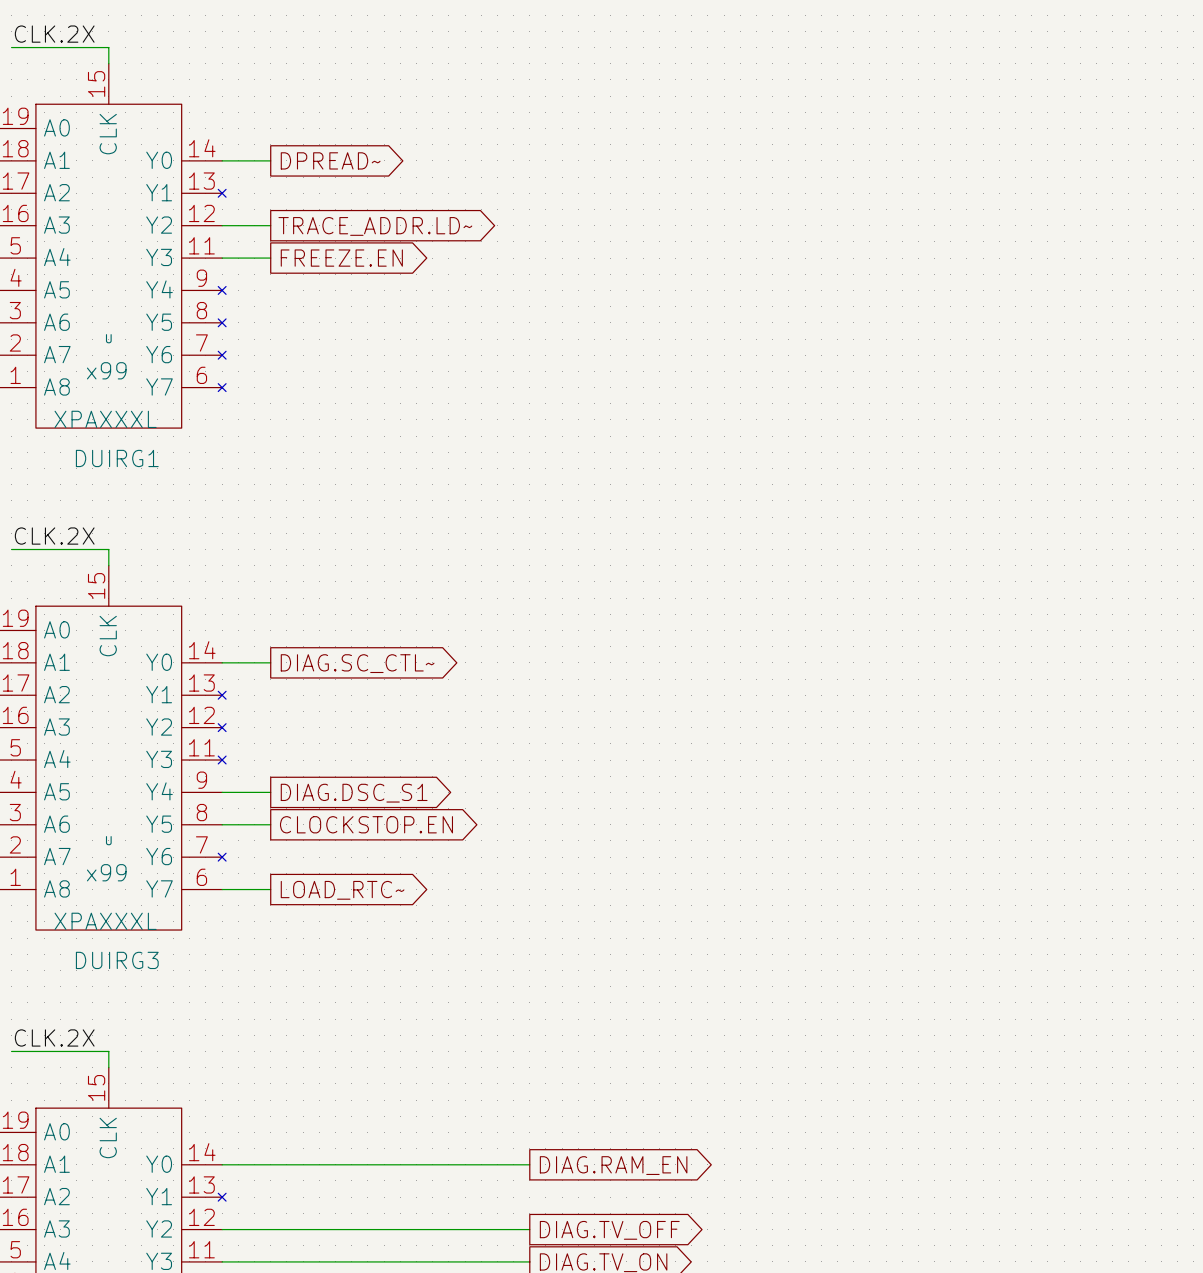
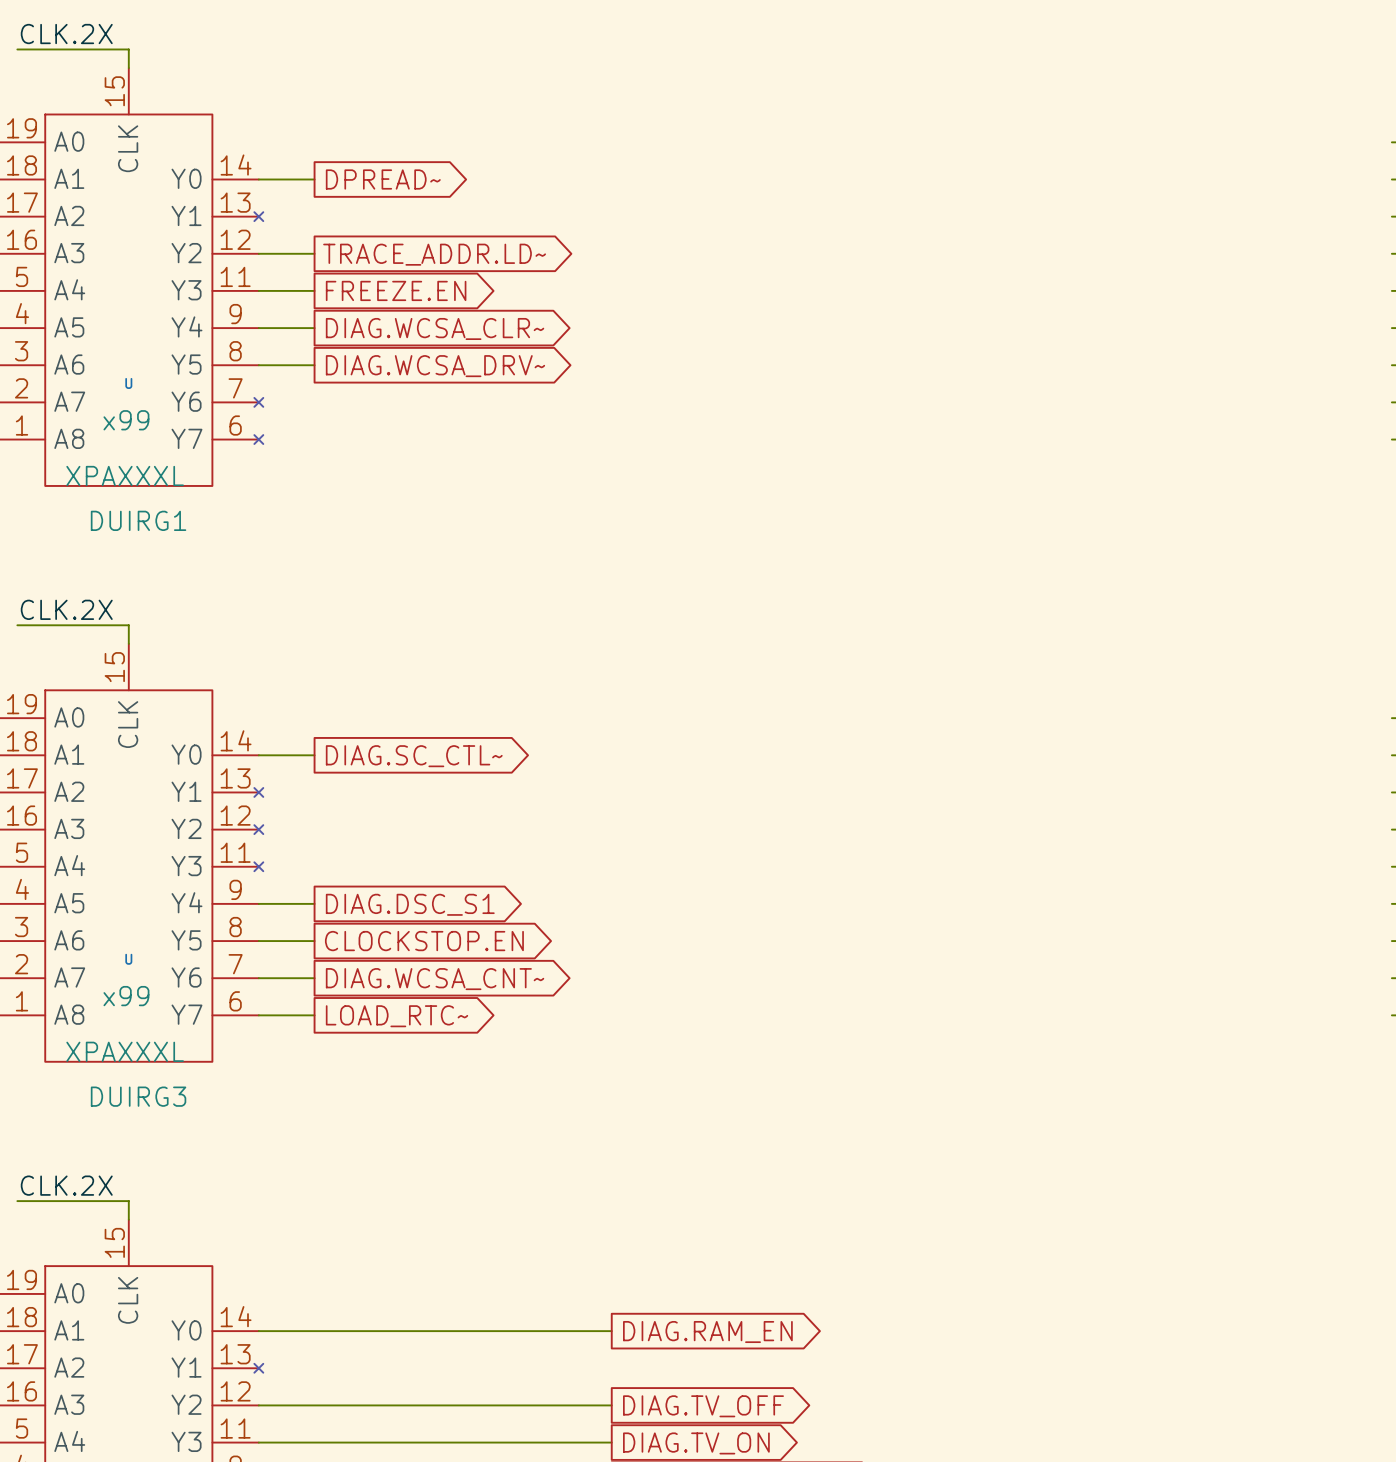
wire: none -> (258, 328) (314, 328)
no-connect mark: (222, 290) -> none
global label: none -> DIAG.WCSA_CLR~ (435, 328)
wire: none -> (258, 365) (314, 365)
no-connect mark: (222, 322) -> none
global label: none -> DIAG.WCSA_DRV~ (435, 366)
wire: none -> (258, 978) (314, 978)
no-connect mark: (222, 857) -> none
global label: none -> DIAG.WCSA_CNT~ (435, 979)

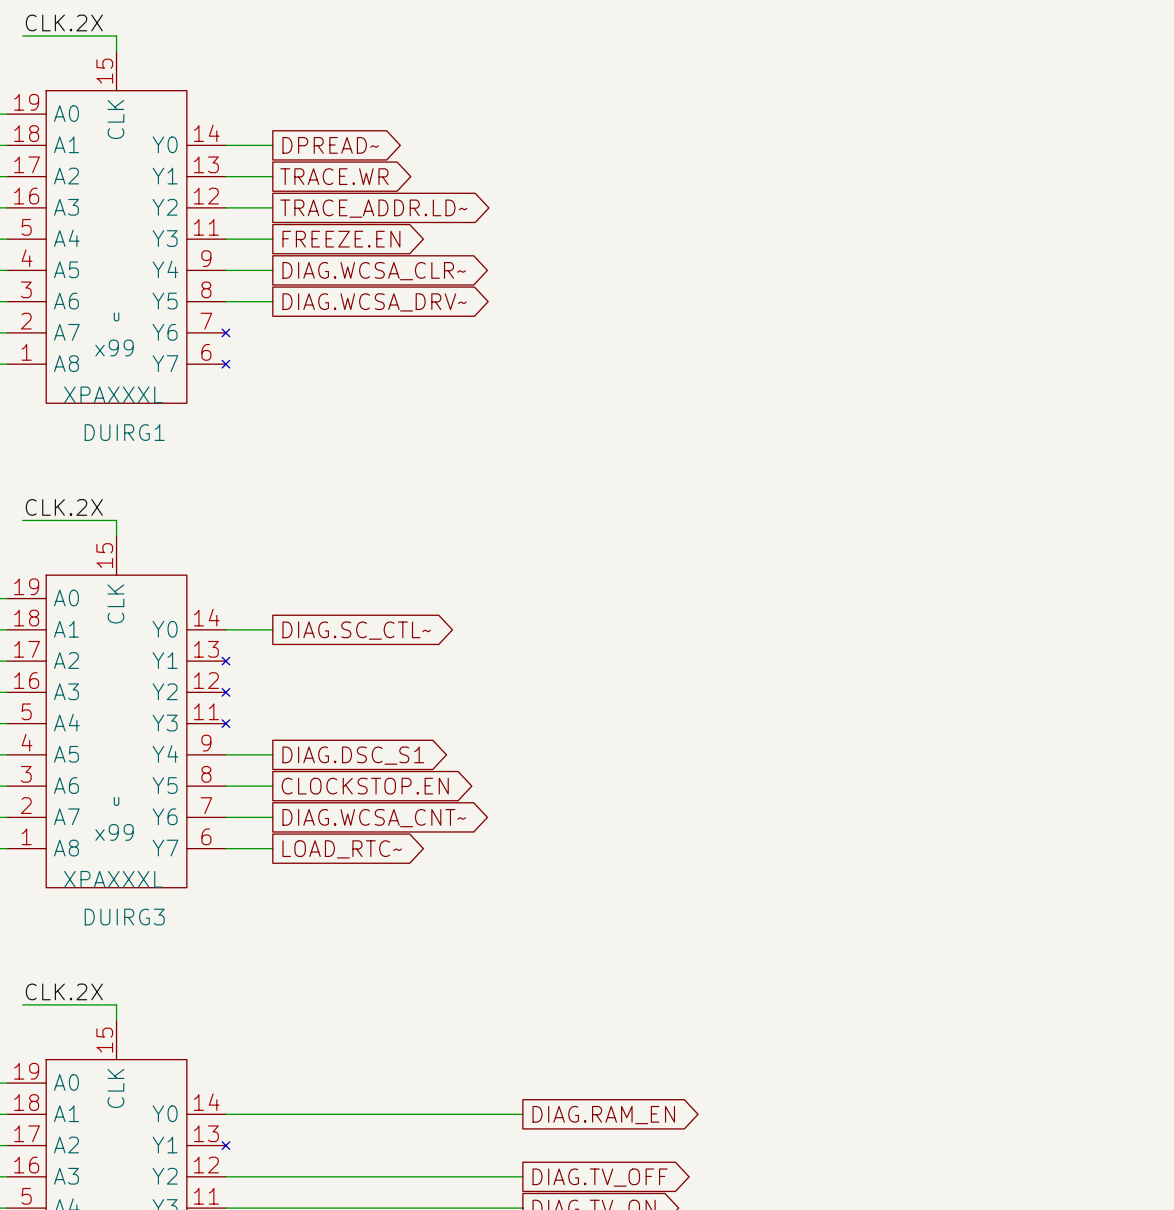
wire: none -> (225, 176) (272, 176)
no-connect mark: (258, 216) -> none
global label: none -> TRACE.WR (334, 176)

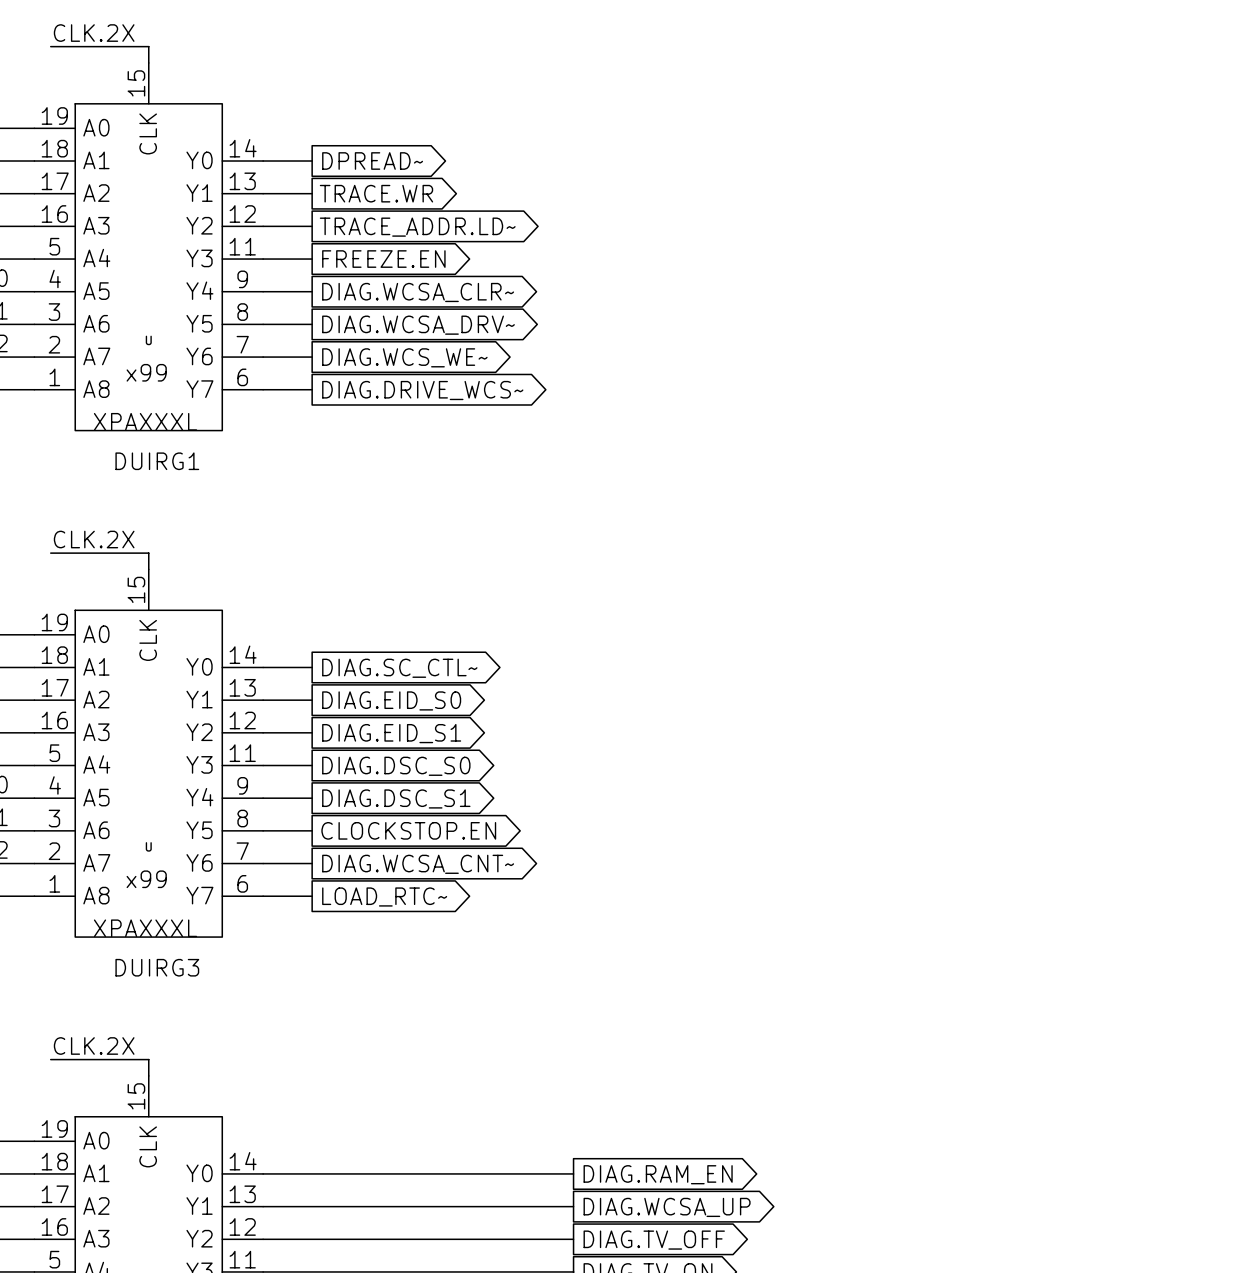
wire: none -> (263, 357) (312, 357)
no-connect mark: (225, 332) -> none
global label: none -> DIAG.WCS_WE~ (404, 357)
wire: none -> (263, 389) (312, 389)
no-connect mark: (225, 364) -> none
global label: none -> DIAG.DRIVE_WCS~ (422, 390)
wire: none -> (263, 700) (312, 700)
no-connect mark: (225, 661) -> none
global label: none -> DIAG.EID_S0 (391, 700)
wire: none -> (263, 732) (312, 732)
no-connect mark: (225, 692) -> none
global label: none -> DIAG.EID_S1 (391, 733)
wire: none -> (263, 765) (312, 765)
no-connect mark: (225, 723) -> none
global label: none -> DIAG.DSC_S0 (396, 766)
wire: none -> (263, 1206) (573, 1206)
no-connect mark: (225, 1145) -> none
global label: none -> DIAG.WCSA_UP (667, 1207)

